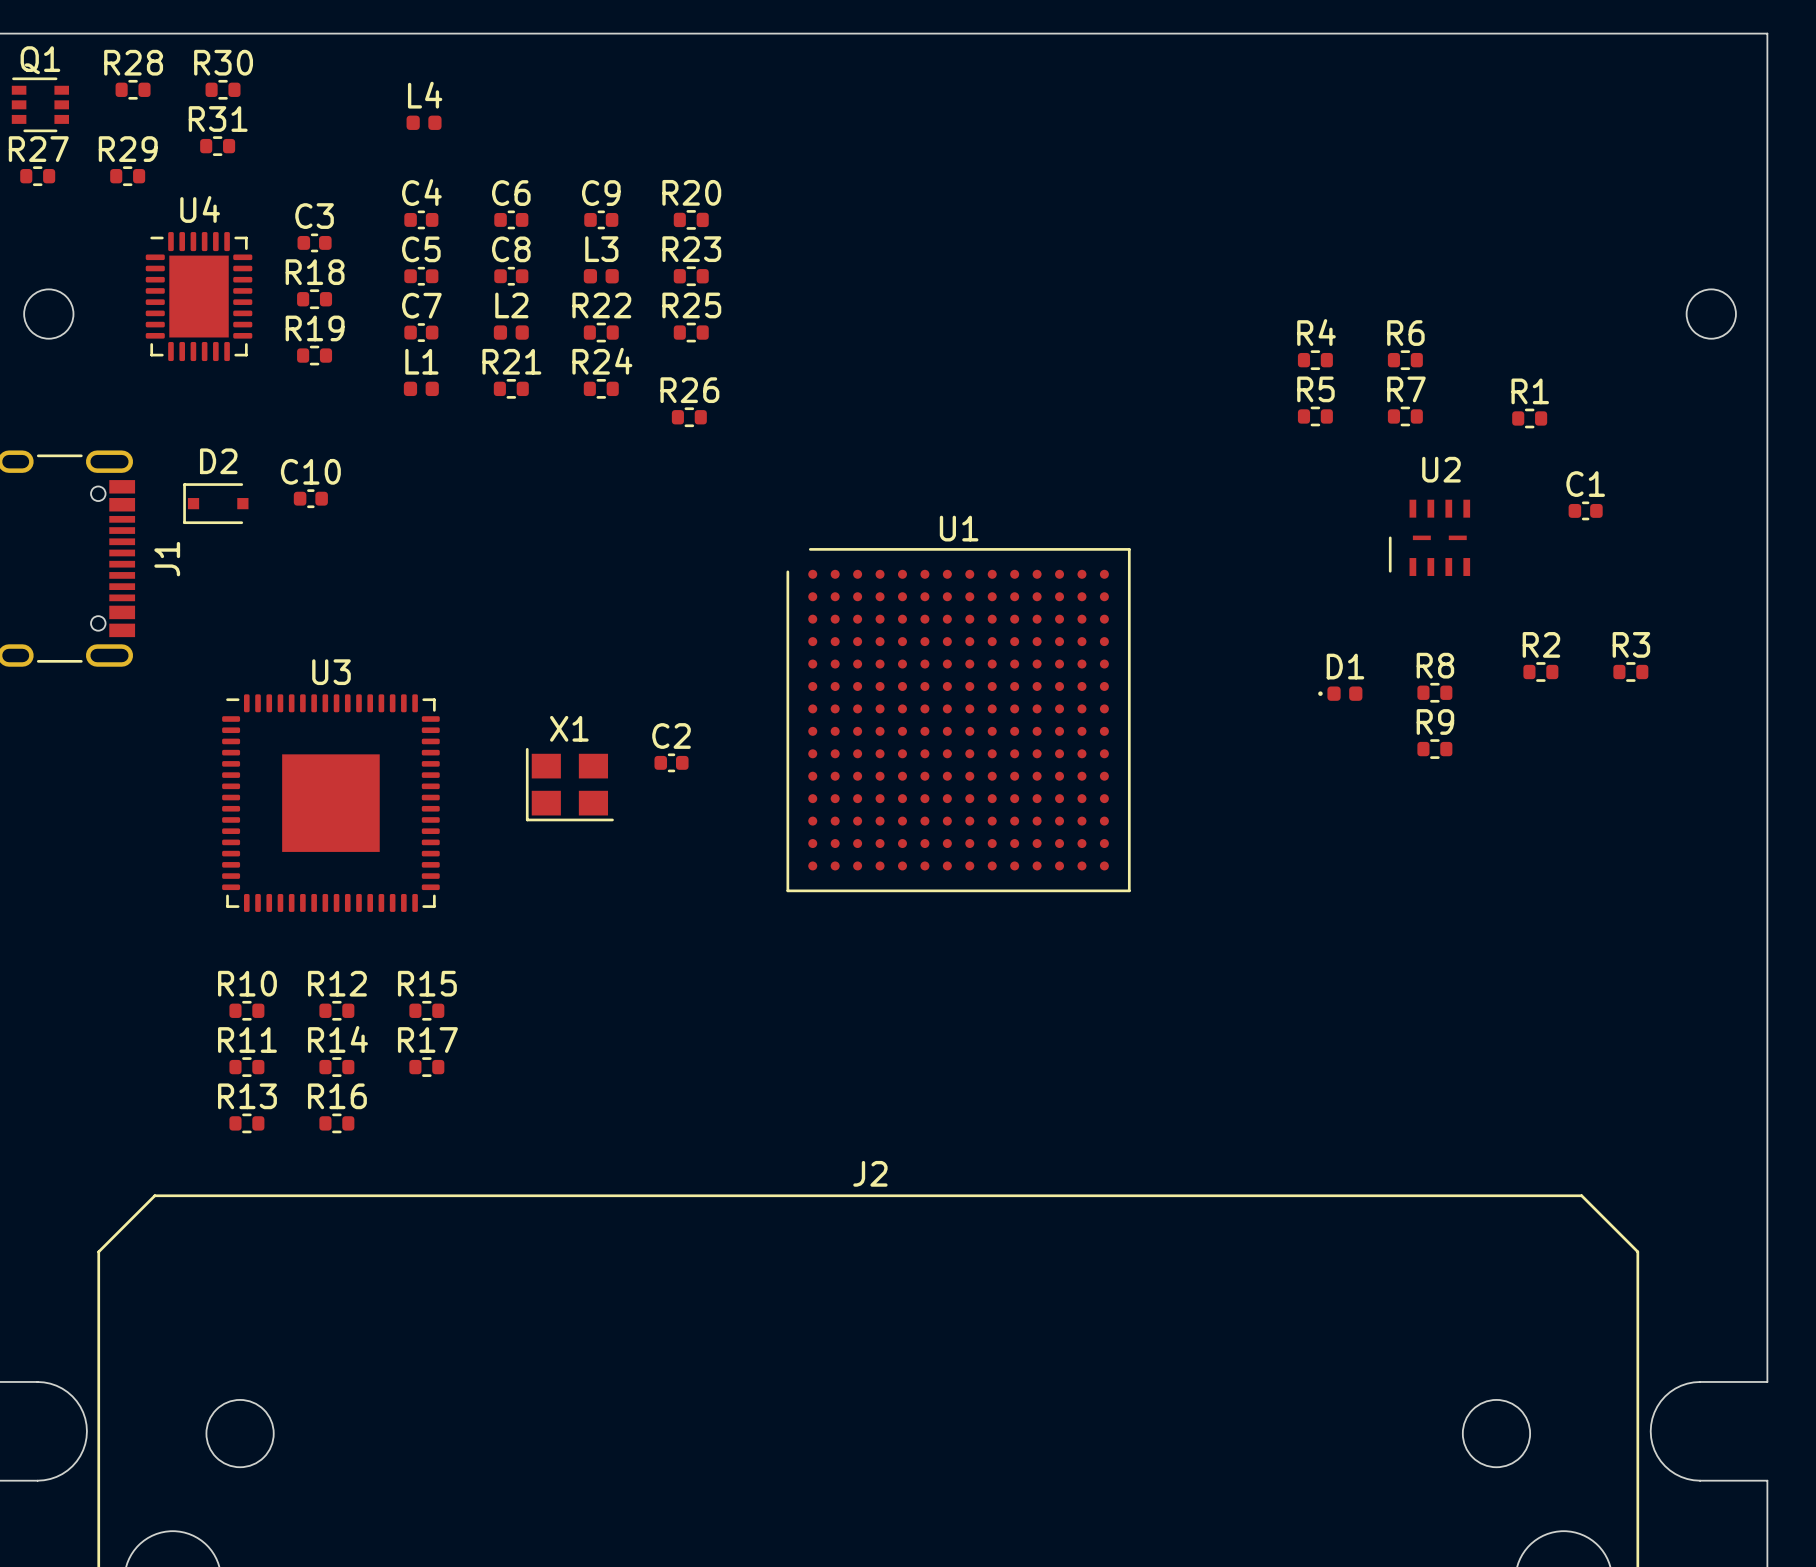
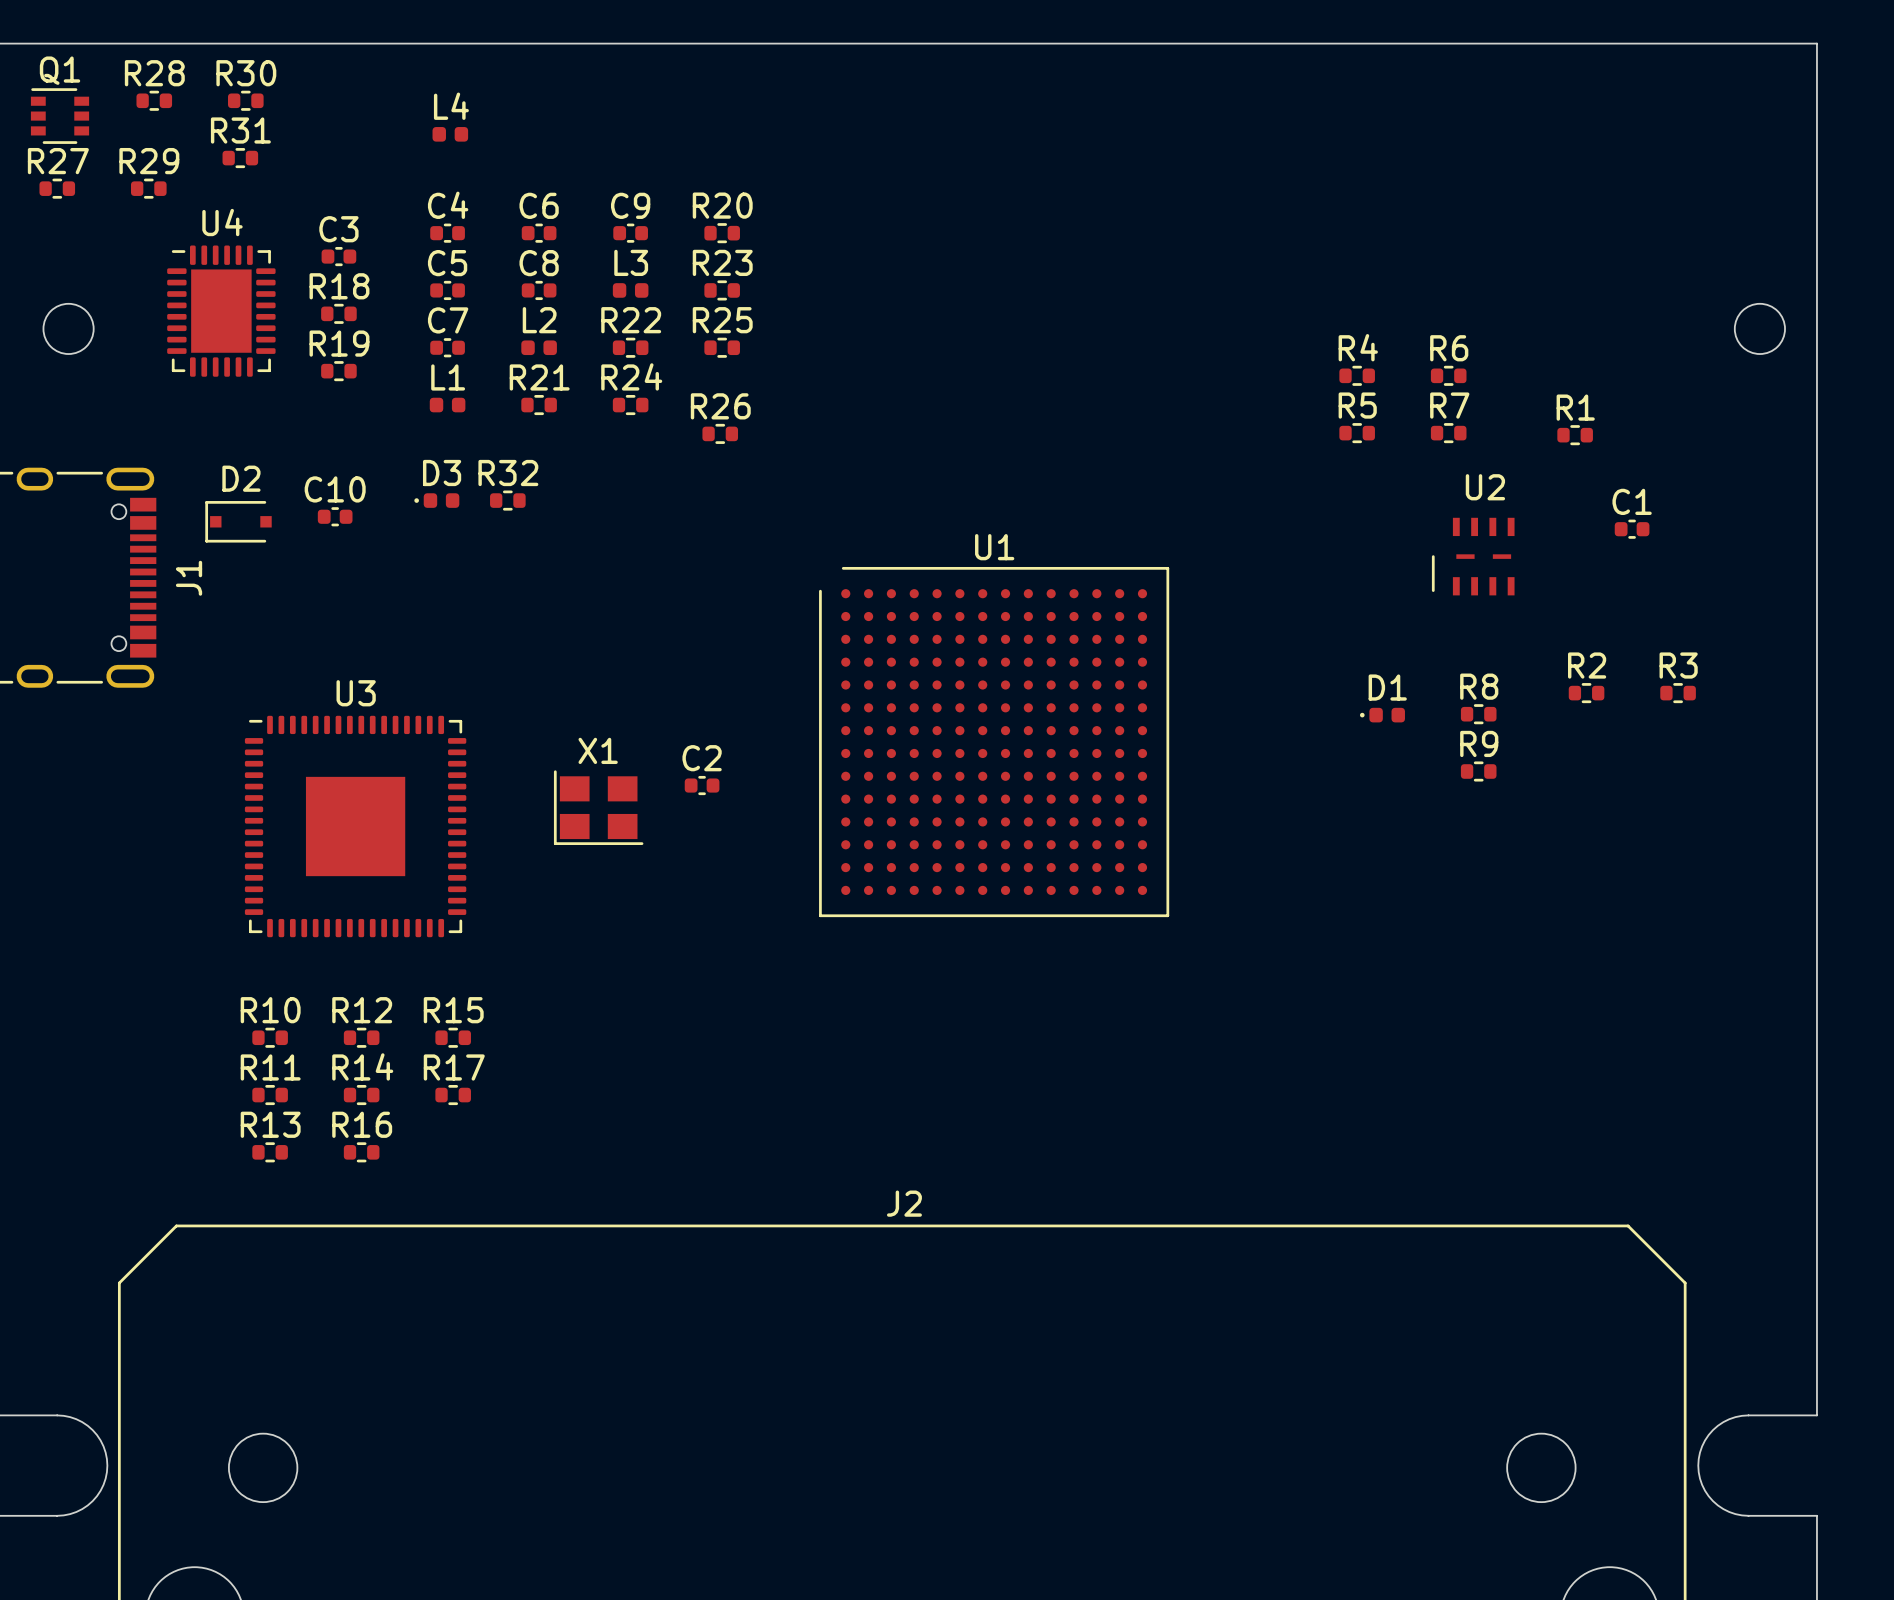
D3: none -> (436, 500)
R32: none -> (507, 500)

